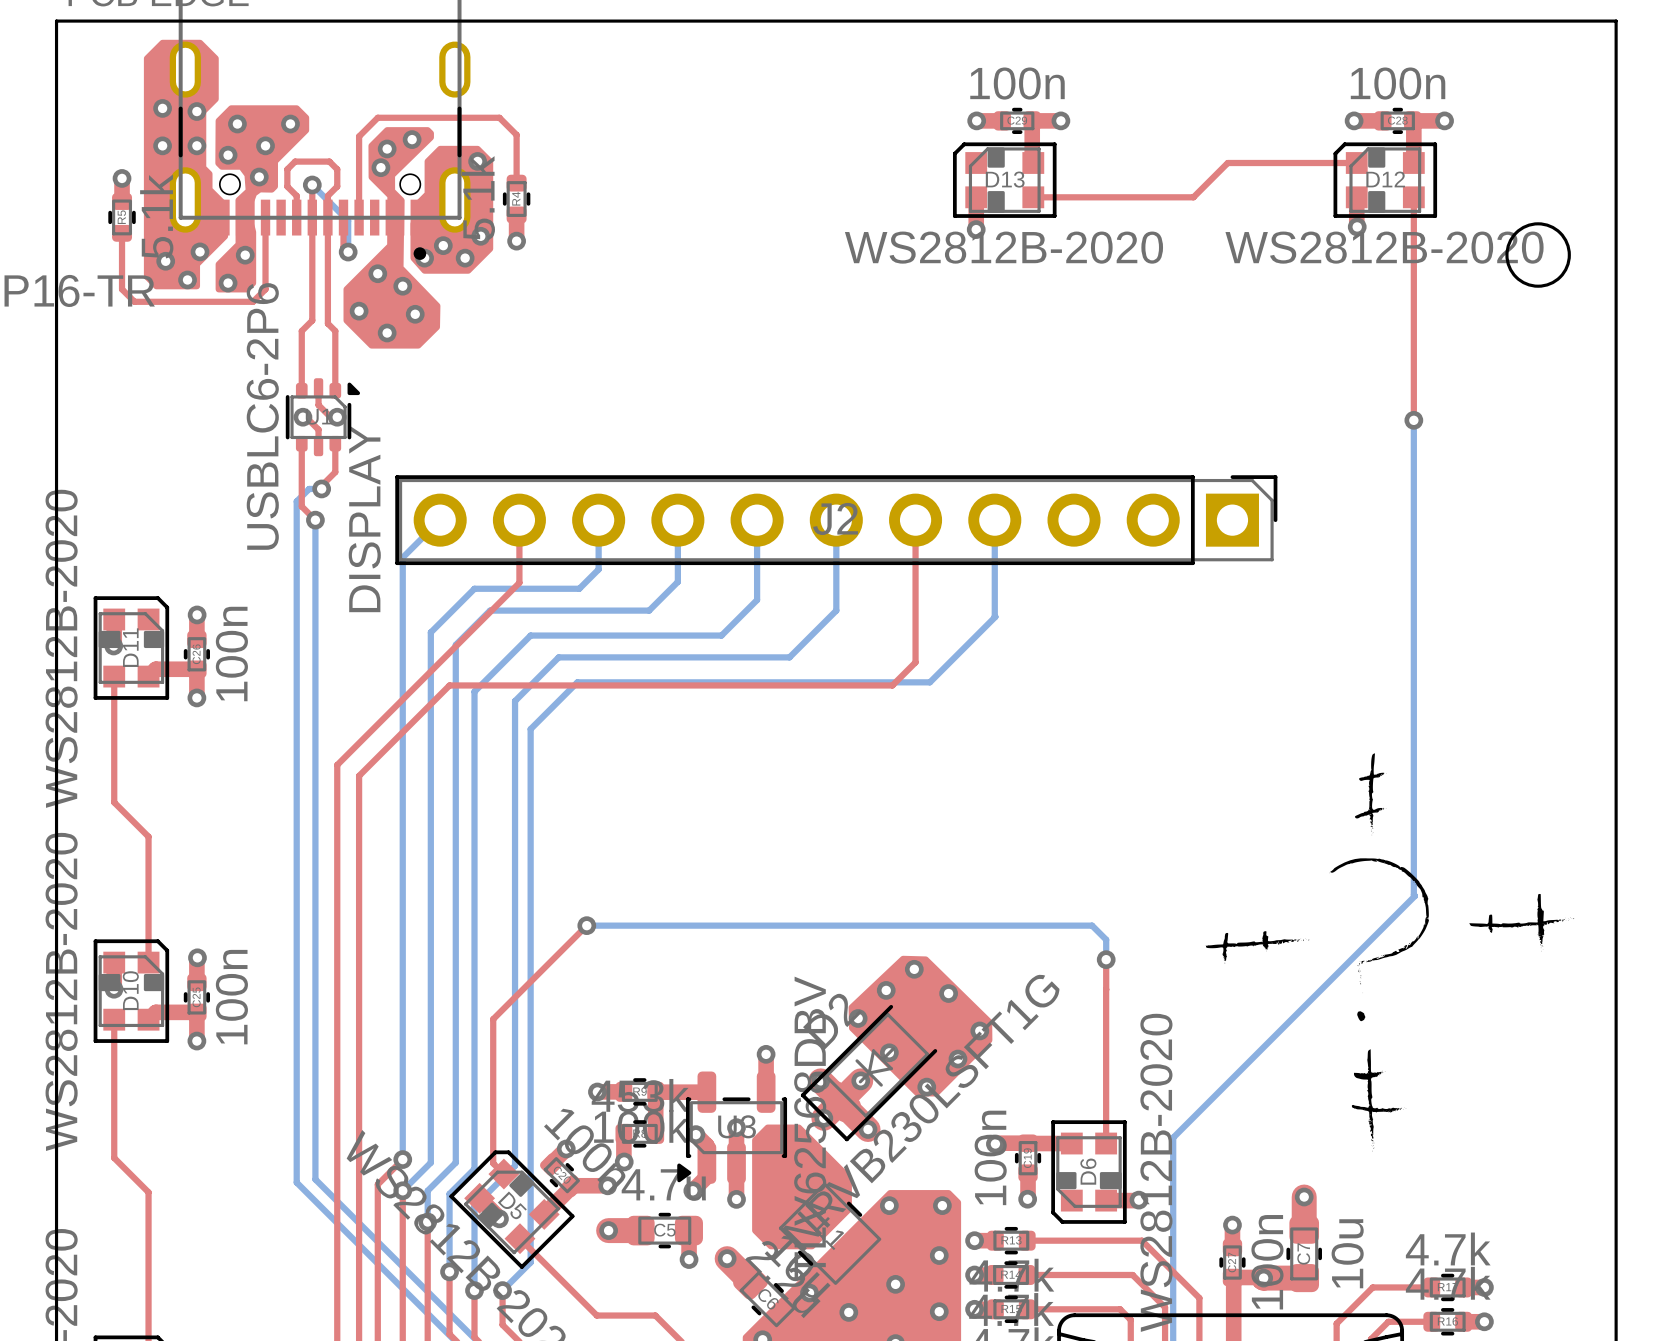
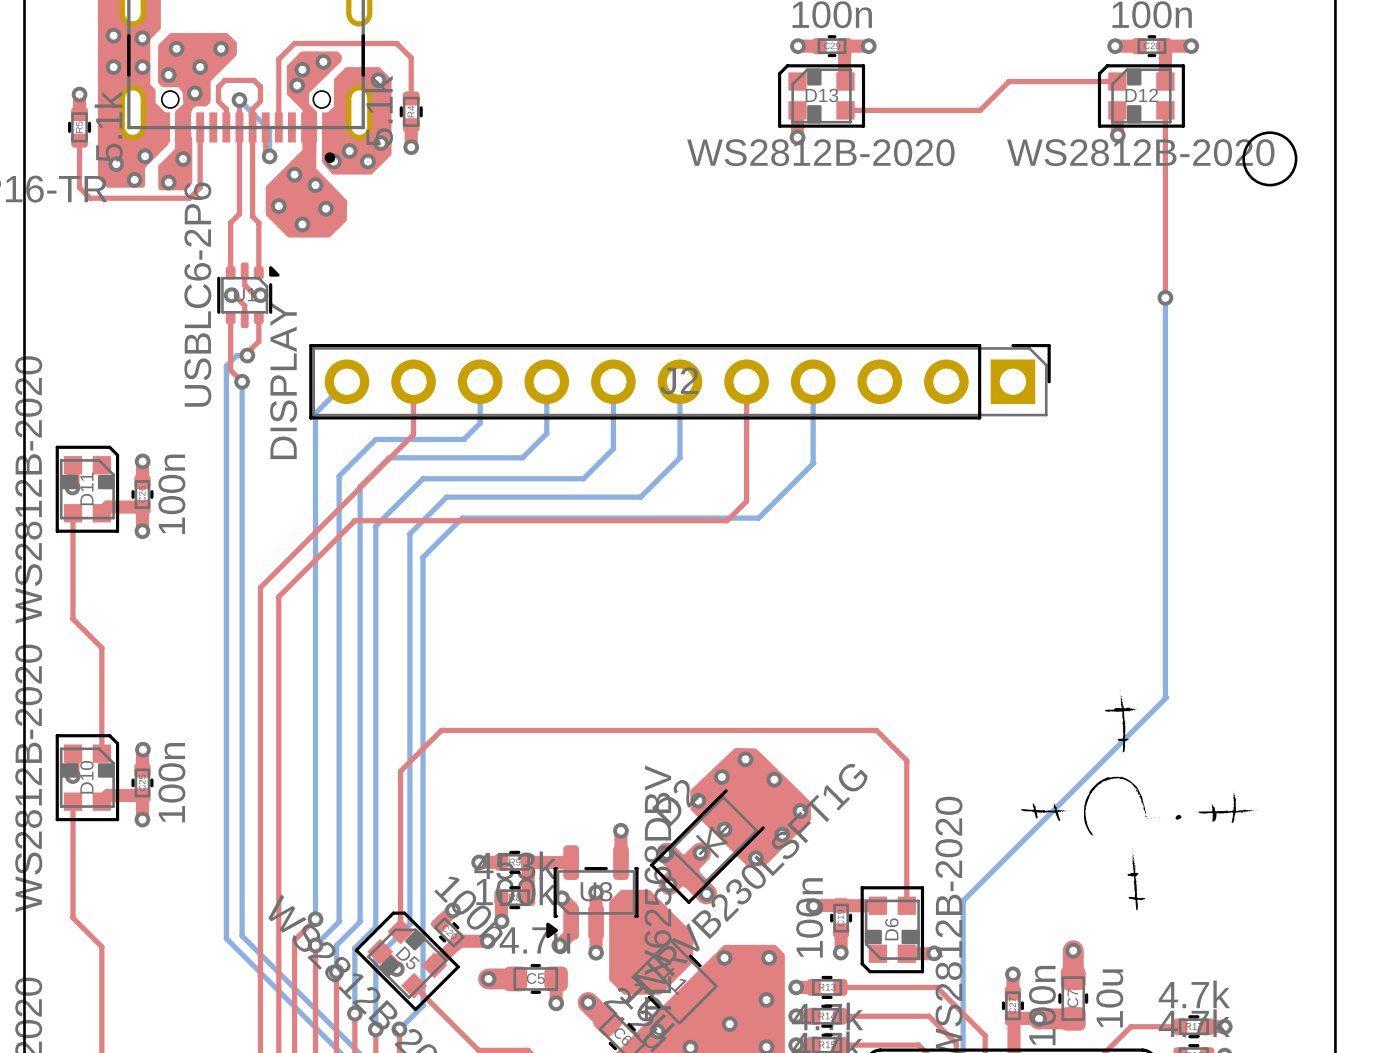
drawing: [1204, 753, 1575, 1152] -> none
drawing: none -> [1021, 689, 1260, 911]
top track: (586, 925) (493, 1019) (493, 1163) (503, 1174) -> (906, 760) (876, 730) (441, 730) (400, 771) (400, 931)
bottom track: (586, 925) (1092, 925) (1106, 939) (1106, 959) -> none
via: (586, 925) -> none
via: (1106, 959) -> none

